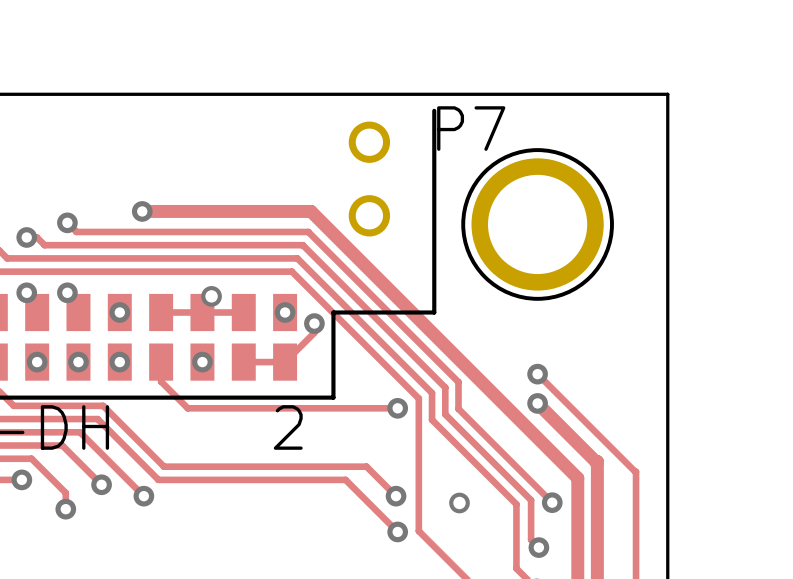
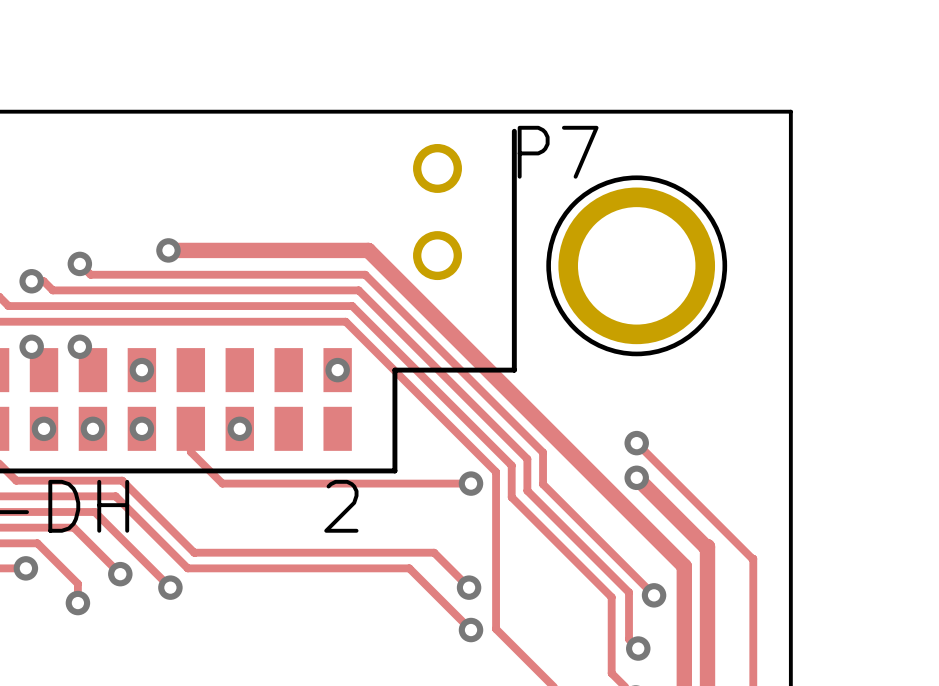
via: (211, 296) -> none
track: (161, 312) (243, 312) -> none
track: (314, 323) (314, 332) (285, 362) (243, 362) -> none
via: (314, 323) -> none
via: (459, 502) -> none

